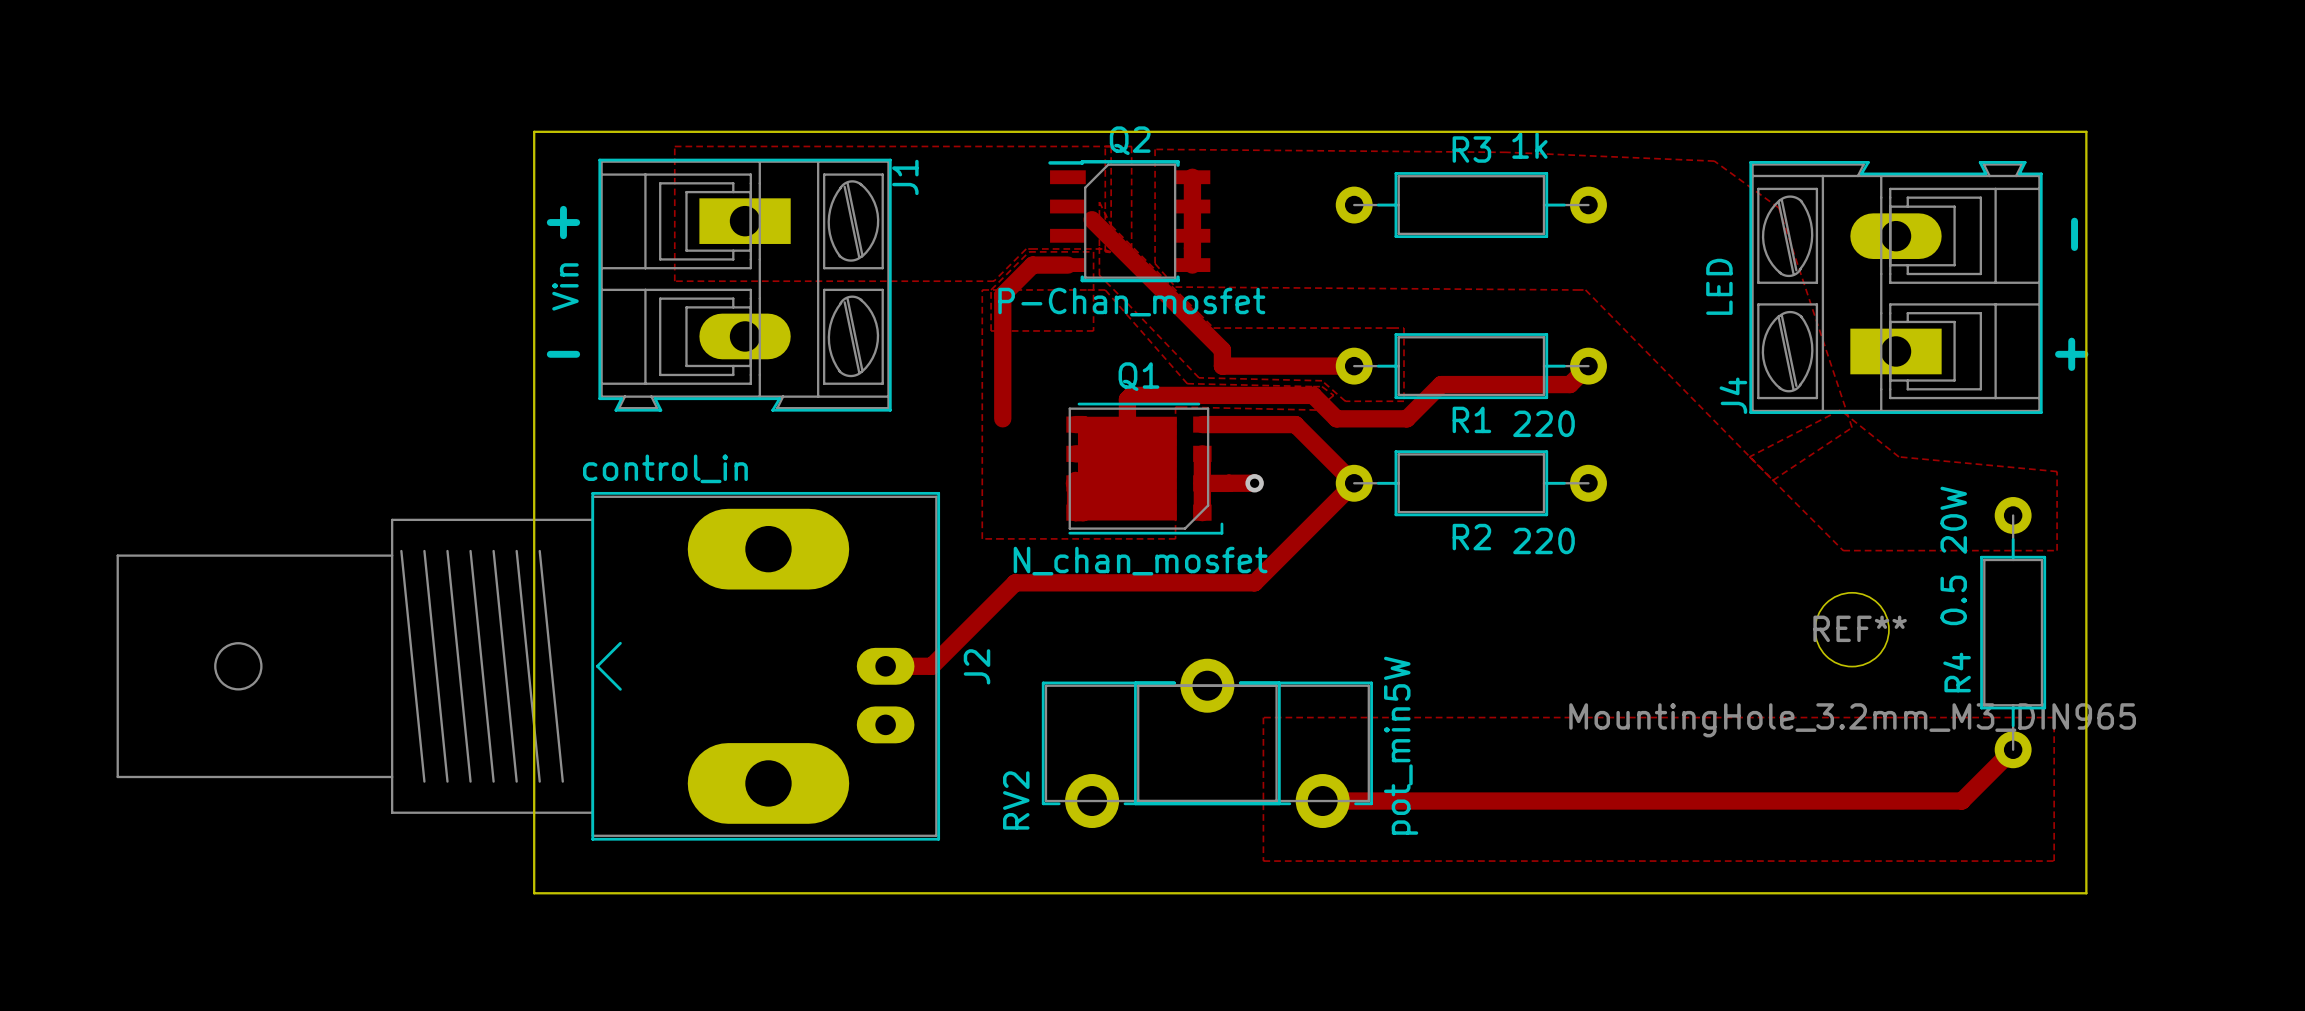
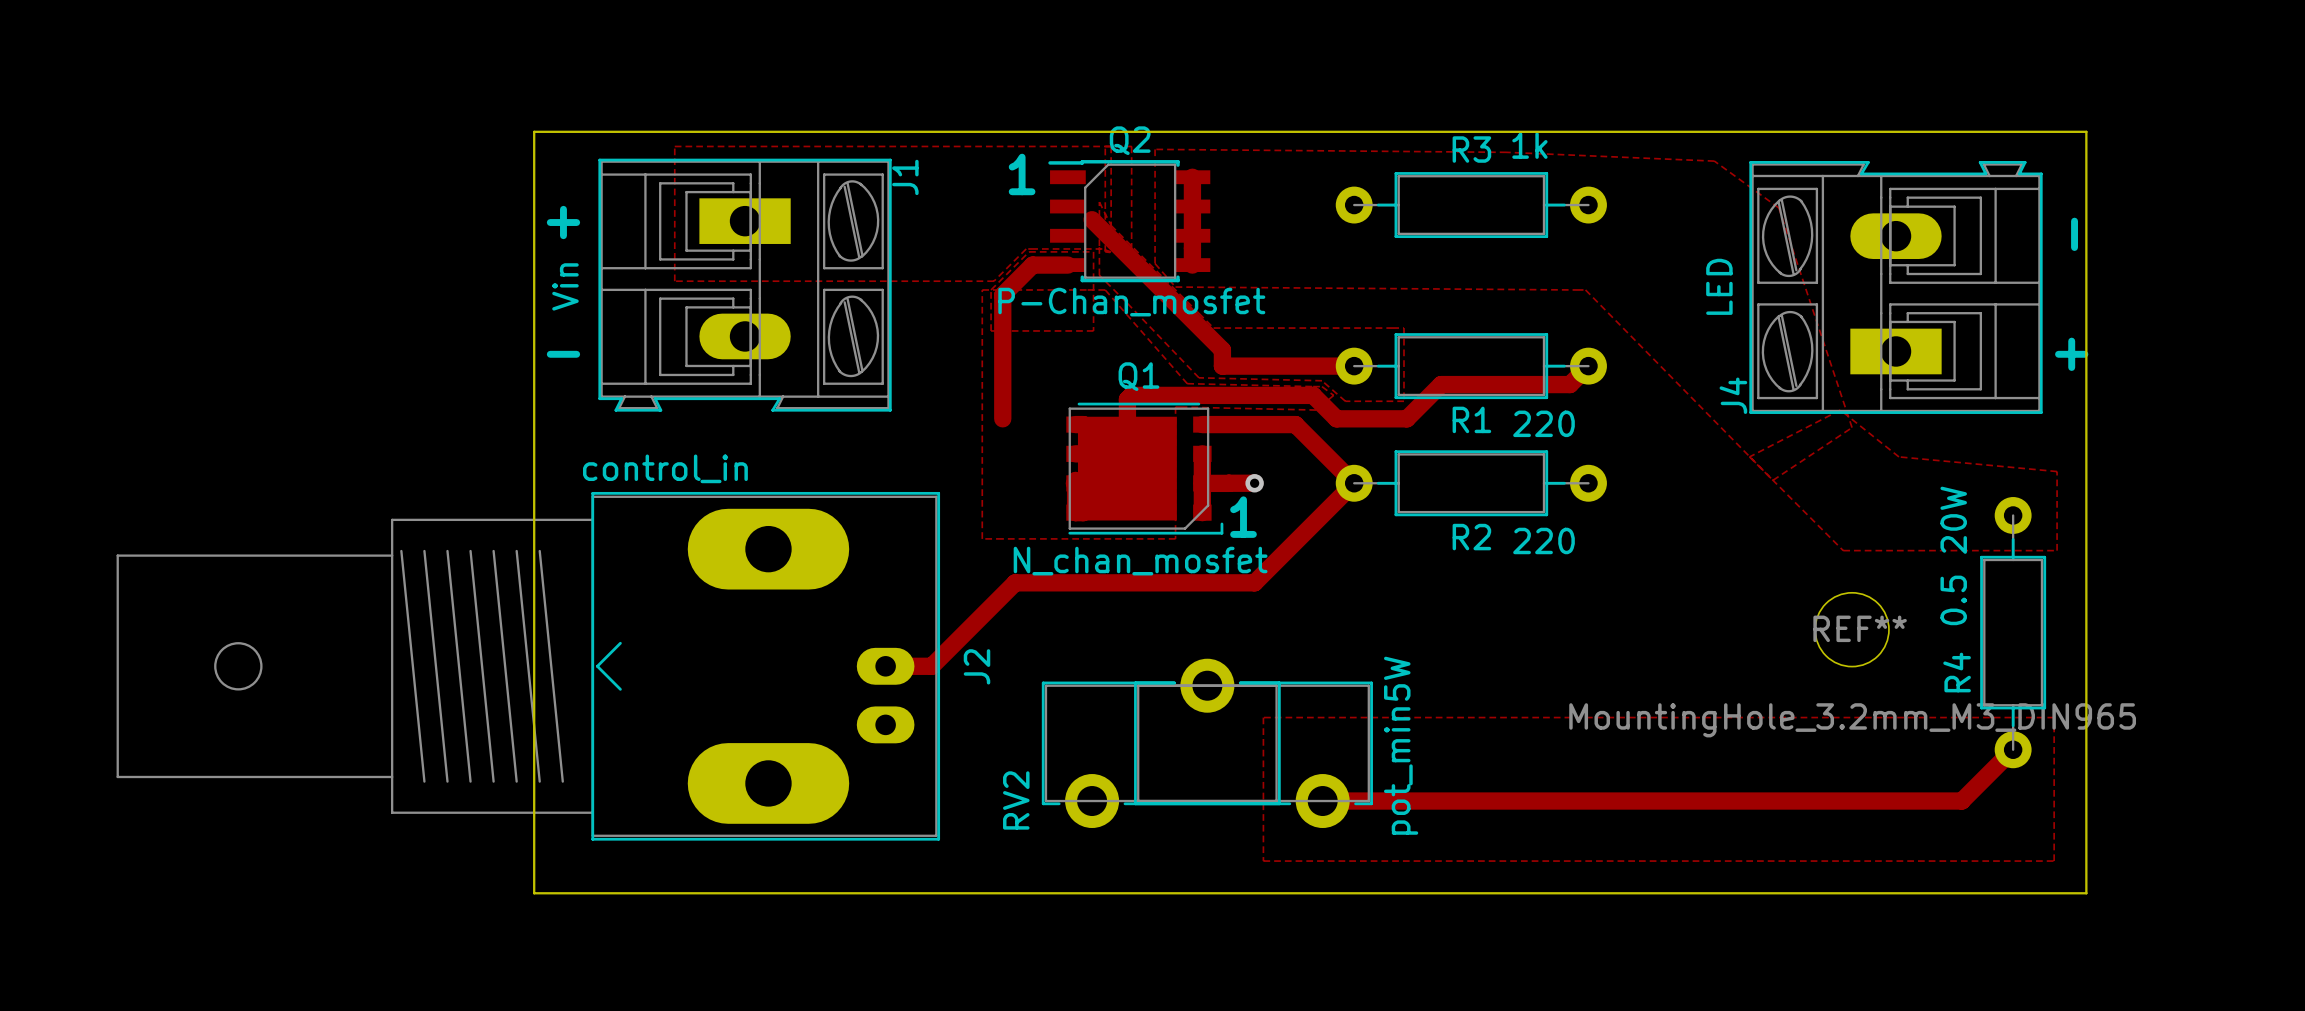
text: none -> 1 (1022, 174)
text: none -> 1 (1243, 517)

